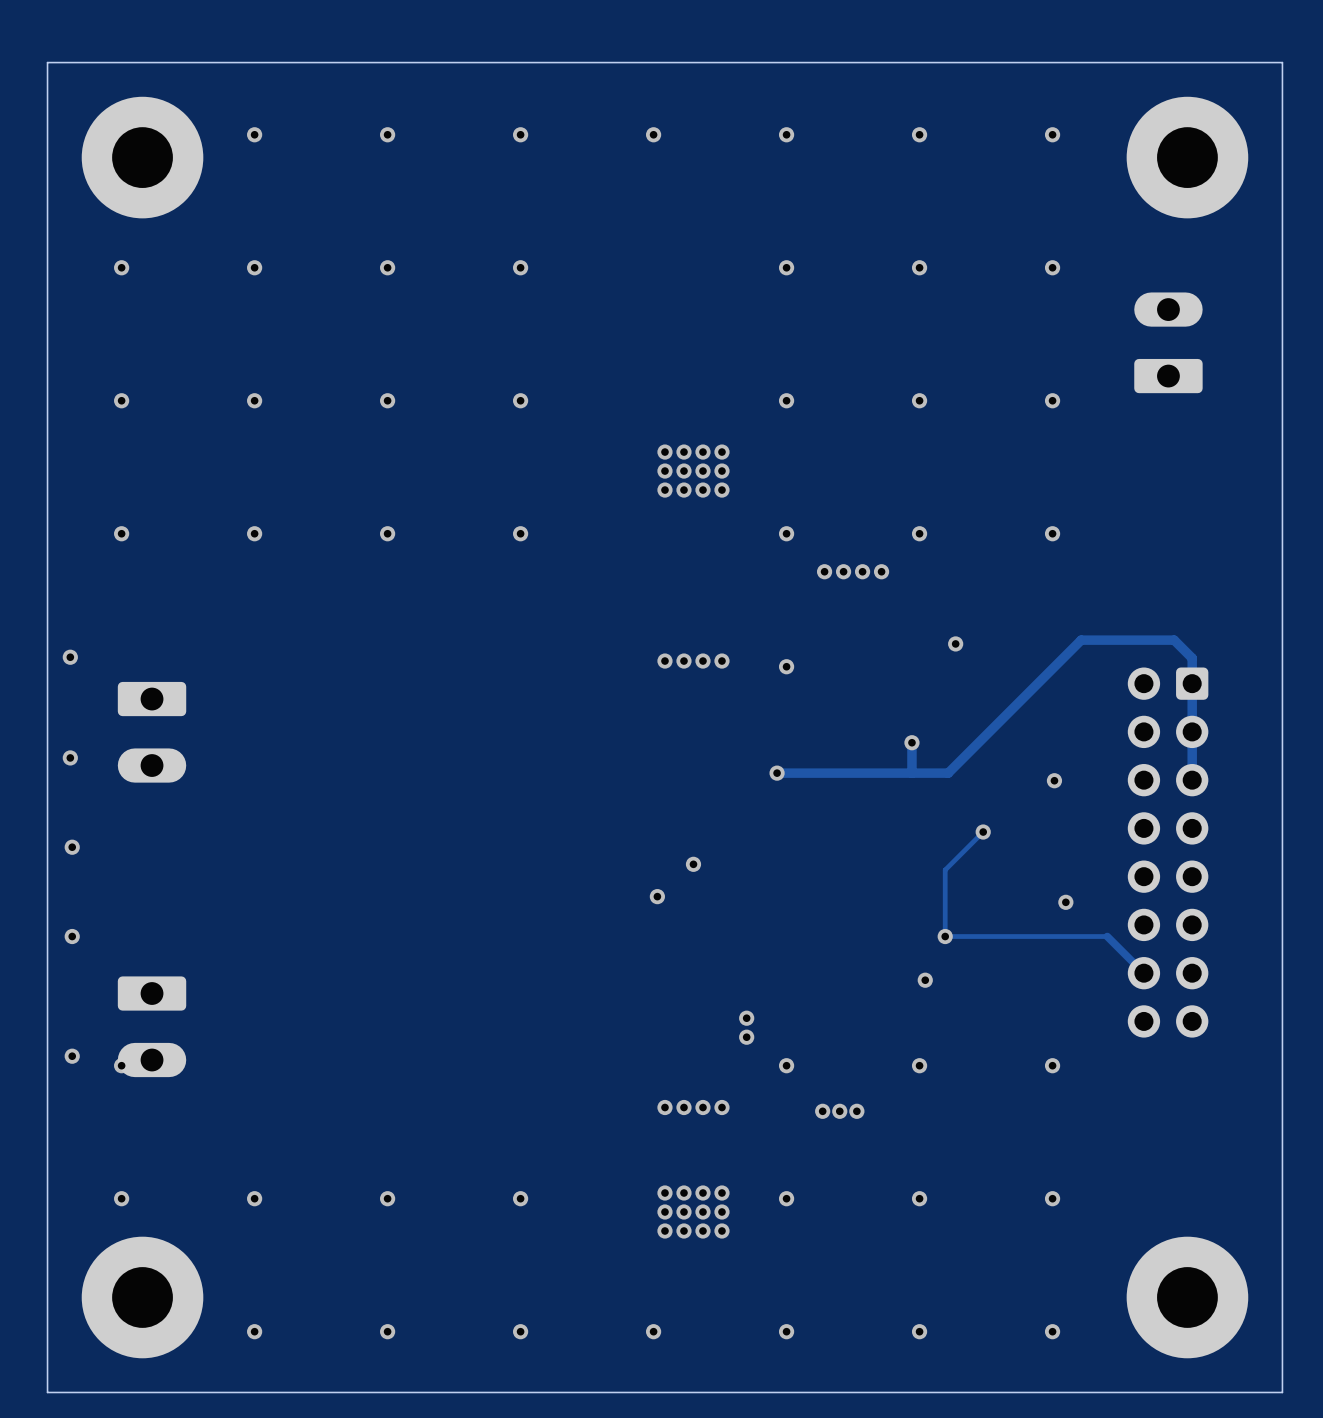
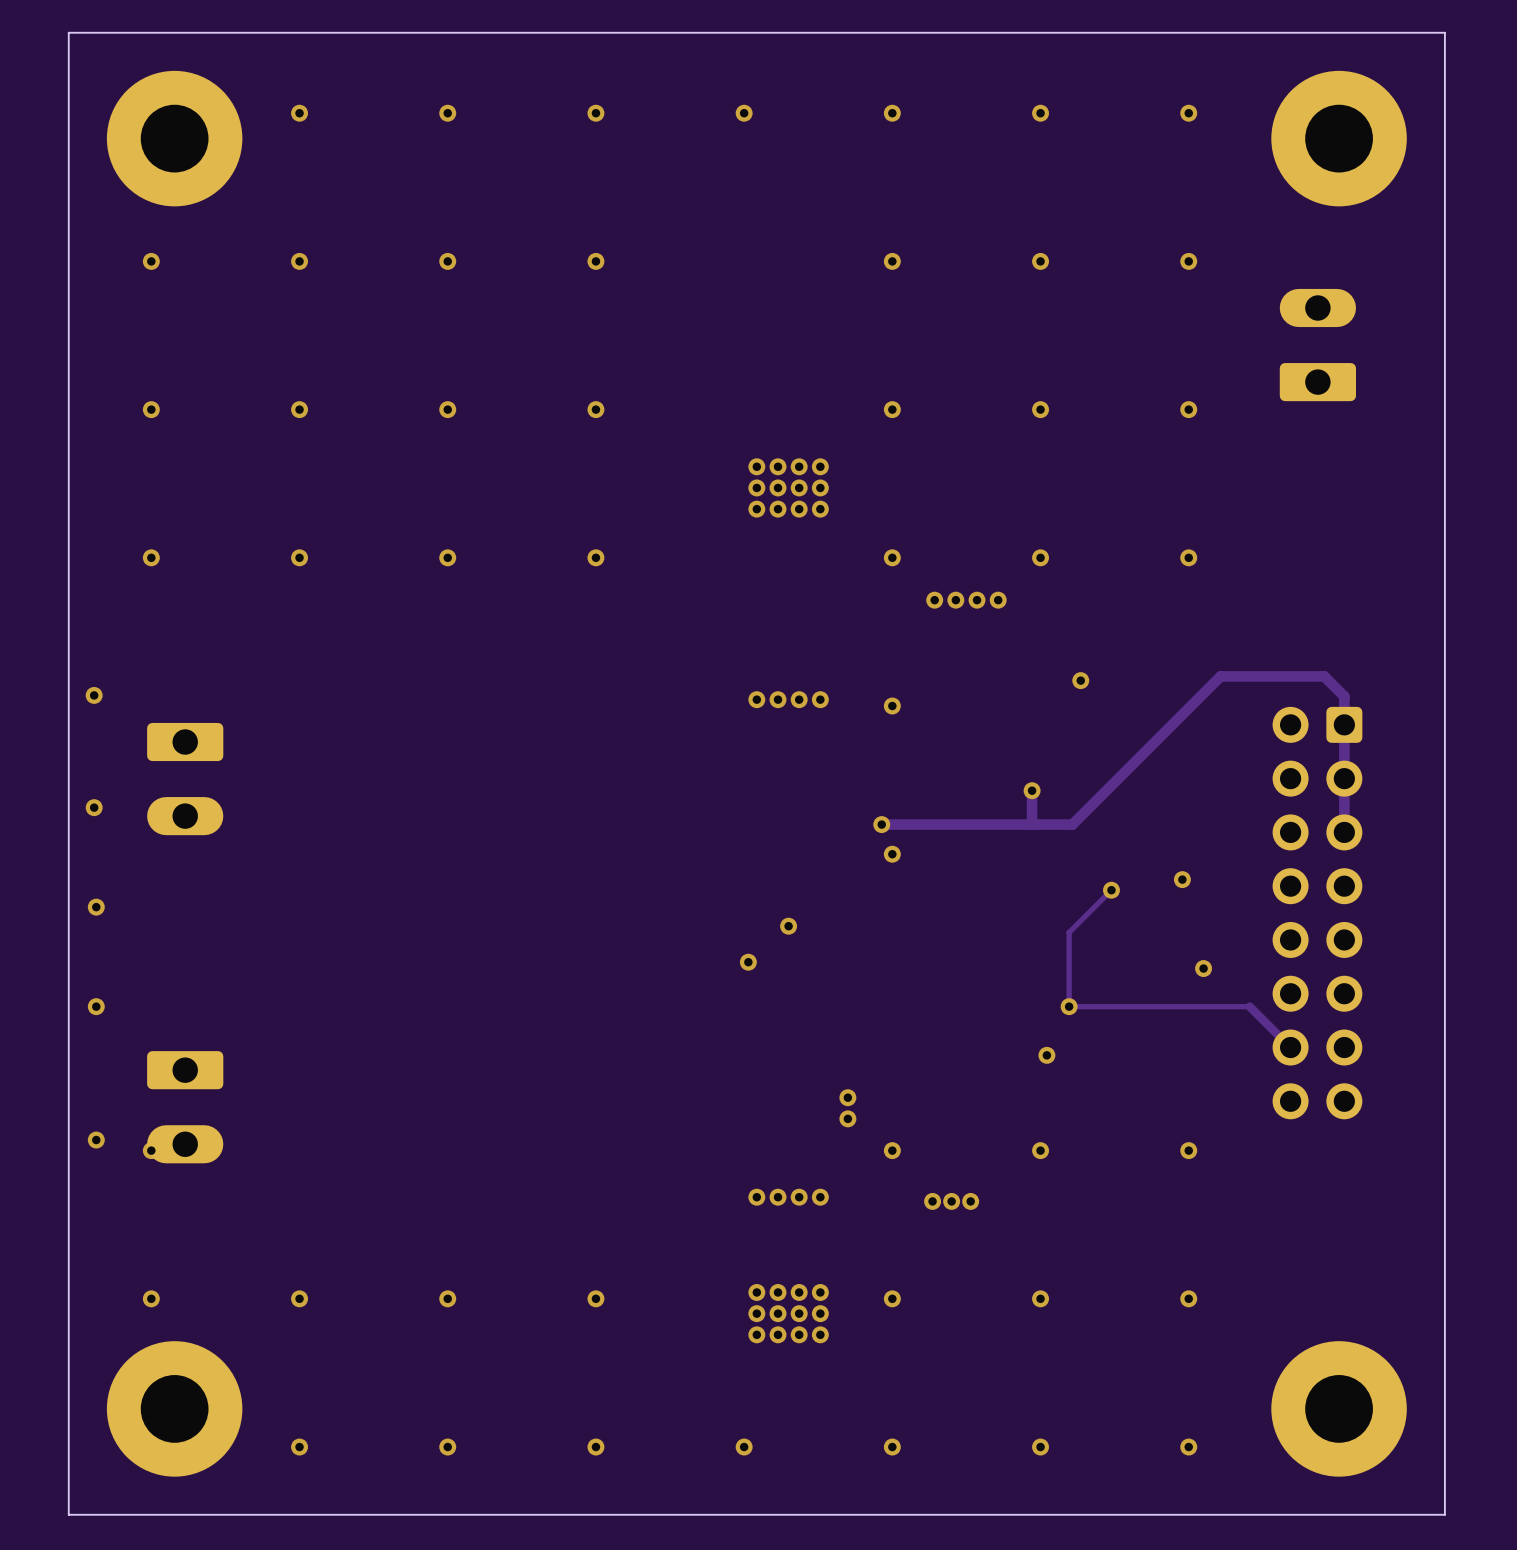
via position: (1054, 780) -> (1182, 879)
via: none -> (892, 854)

